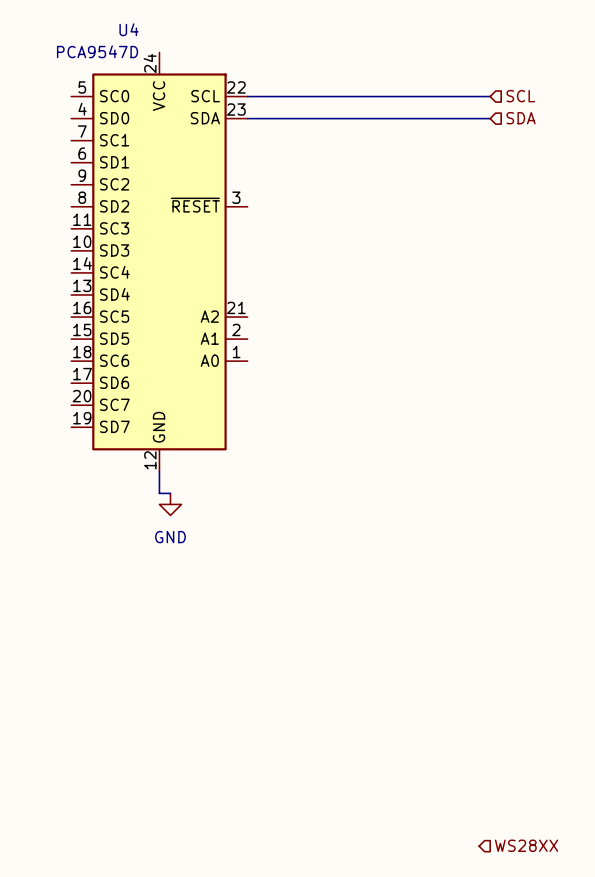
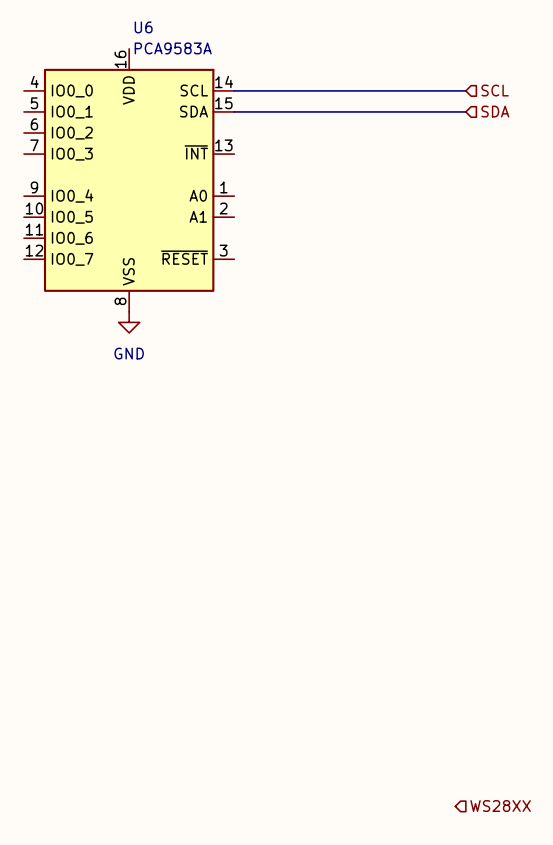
U6: none -> PCA9583A (129, 180)
U4: PCA9547D (159, 261) -> none
wire: (159, 471) (159, 493) (170, 493) -> none
power symbol position: GND (170, 504) -> GND (129, 322)

